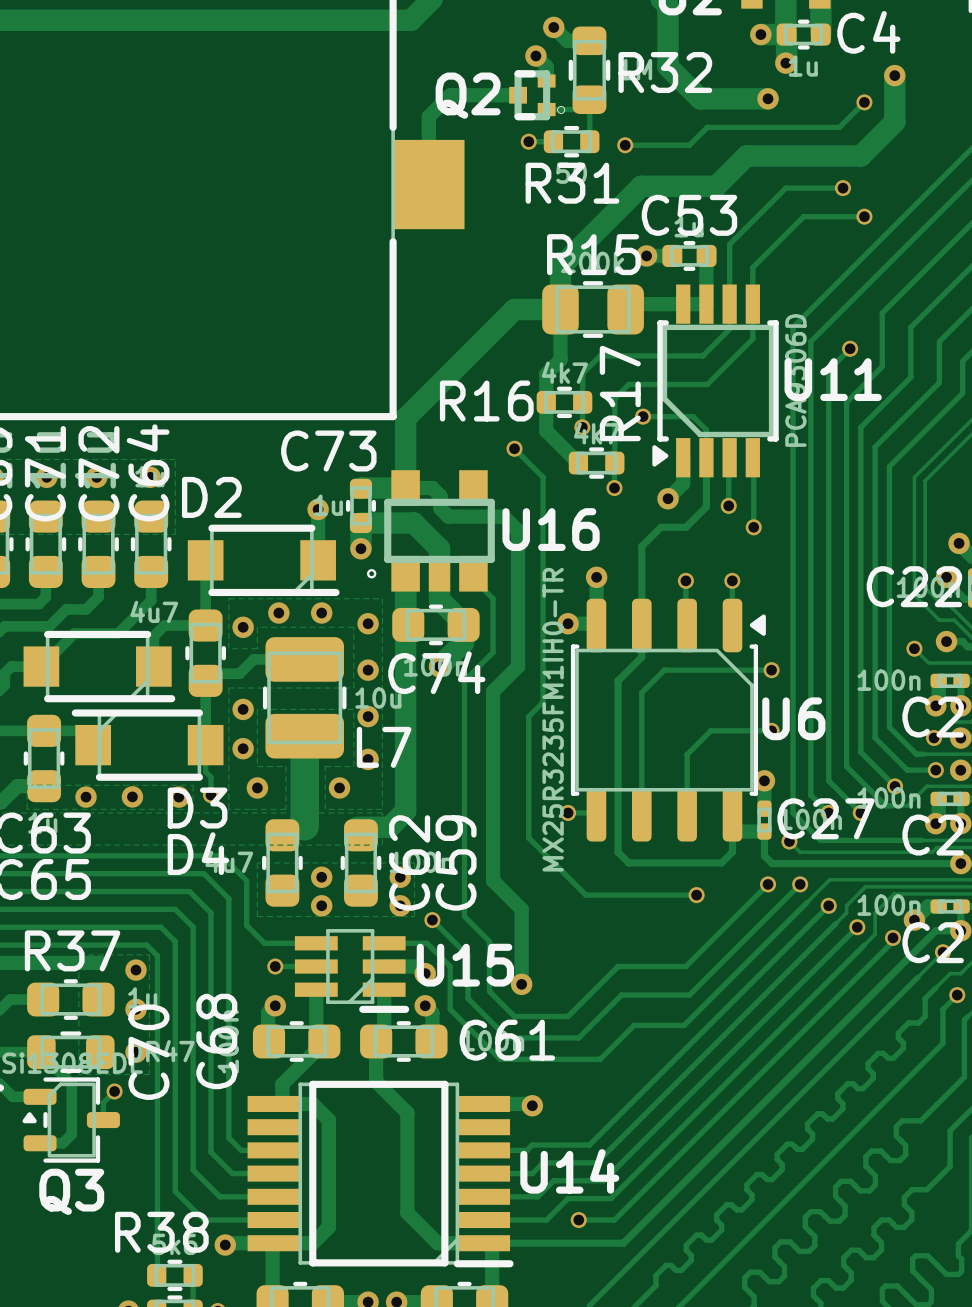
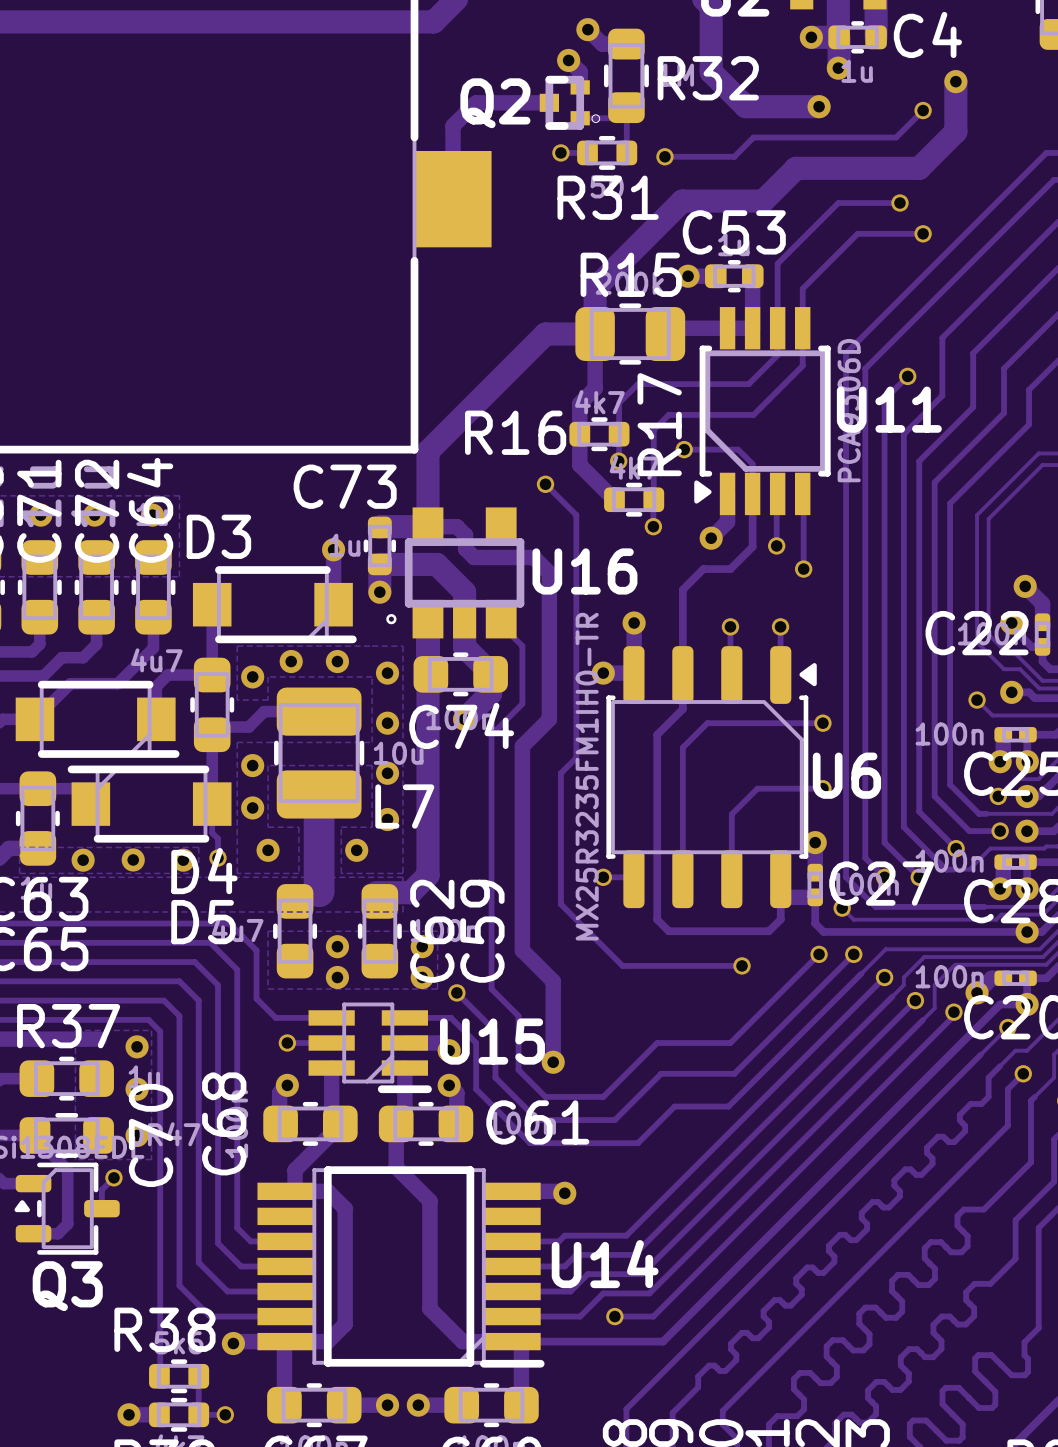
D2 name: D2 (211, 497) -> D3 (218, 536)
D3 name: D3 (197, 808) -> D4 (204, 871)
D4 name: D4 (198, 853) -> D5 (203, 922)

